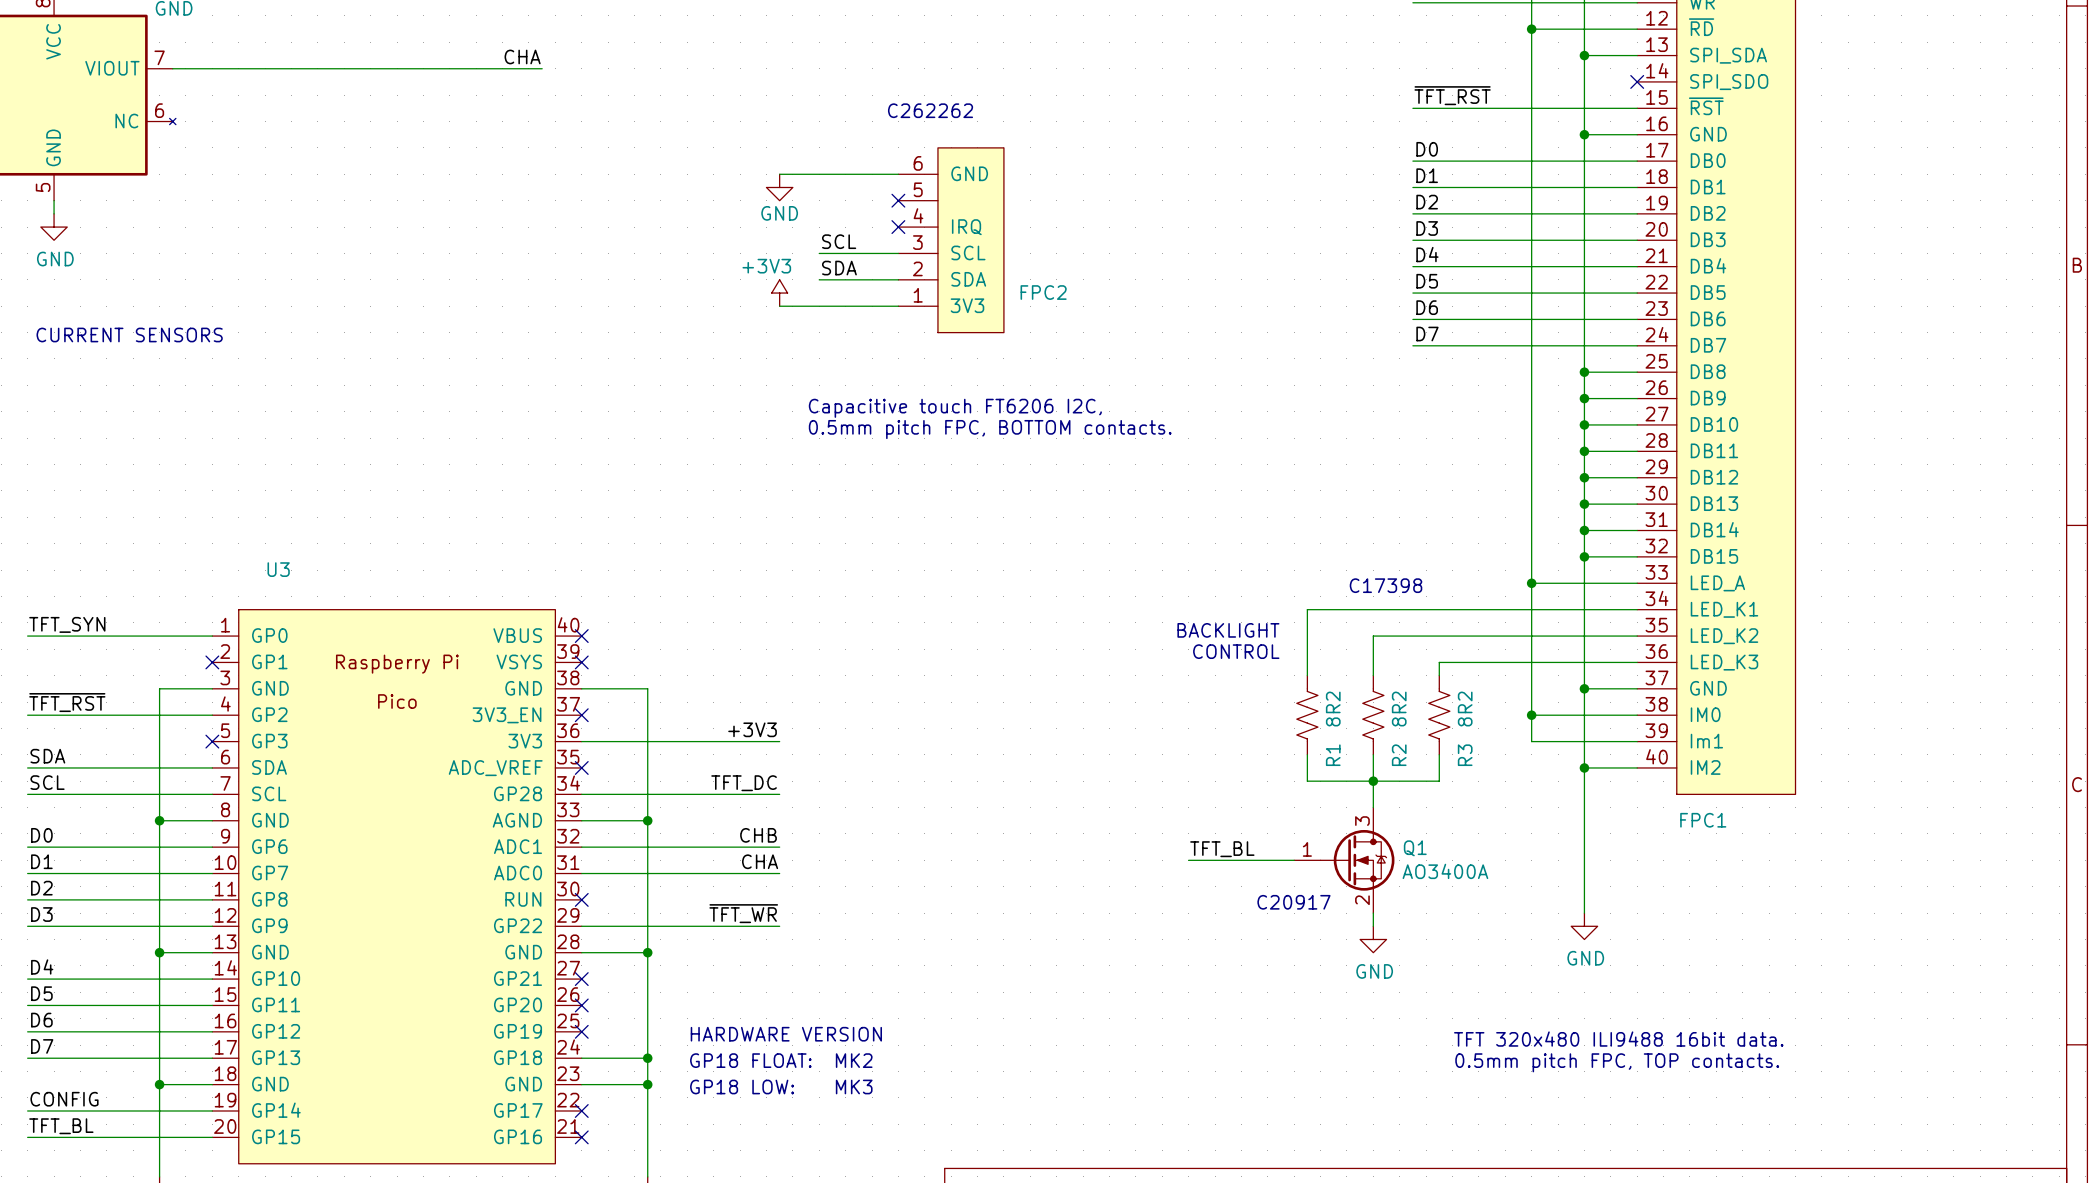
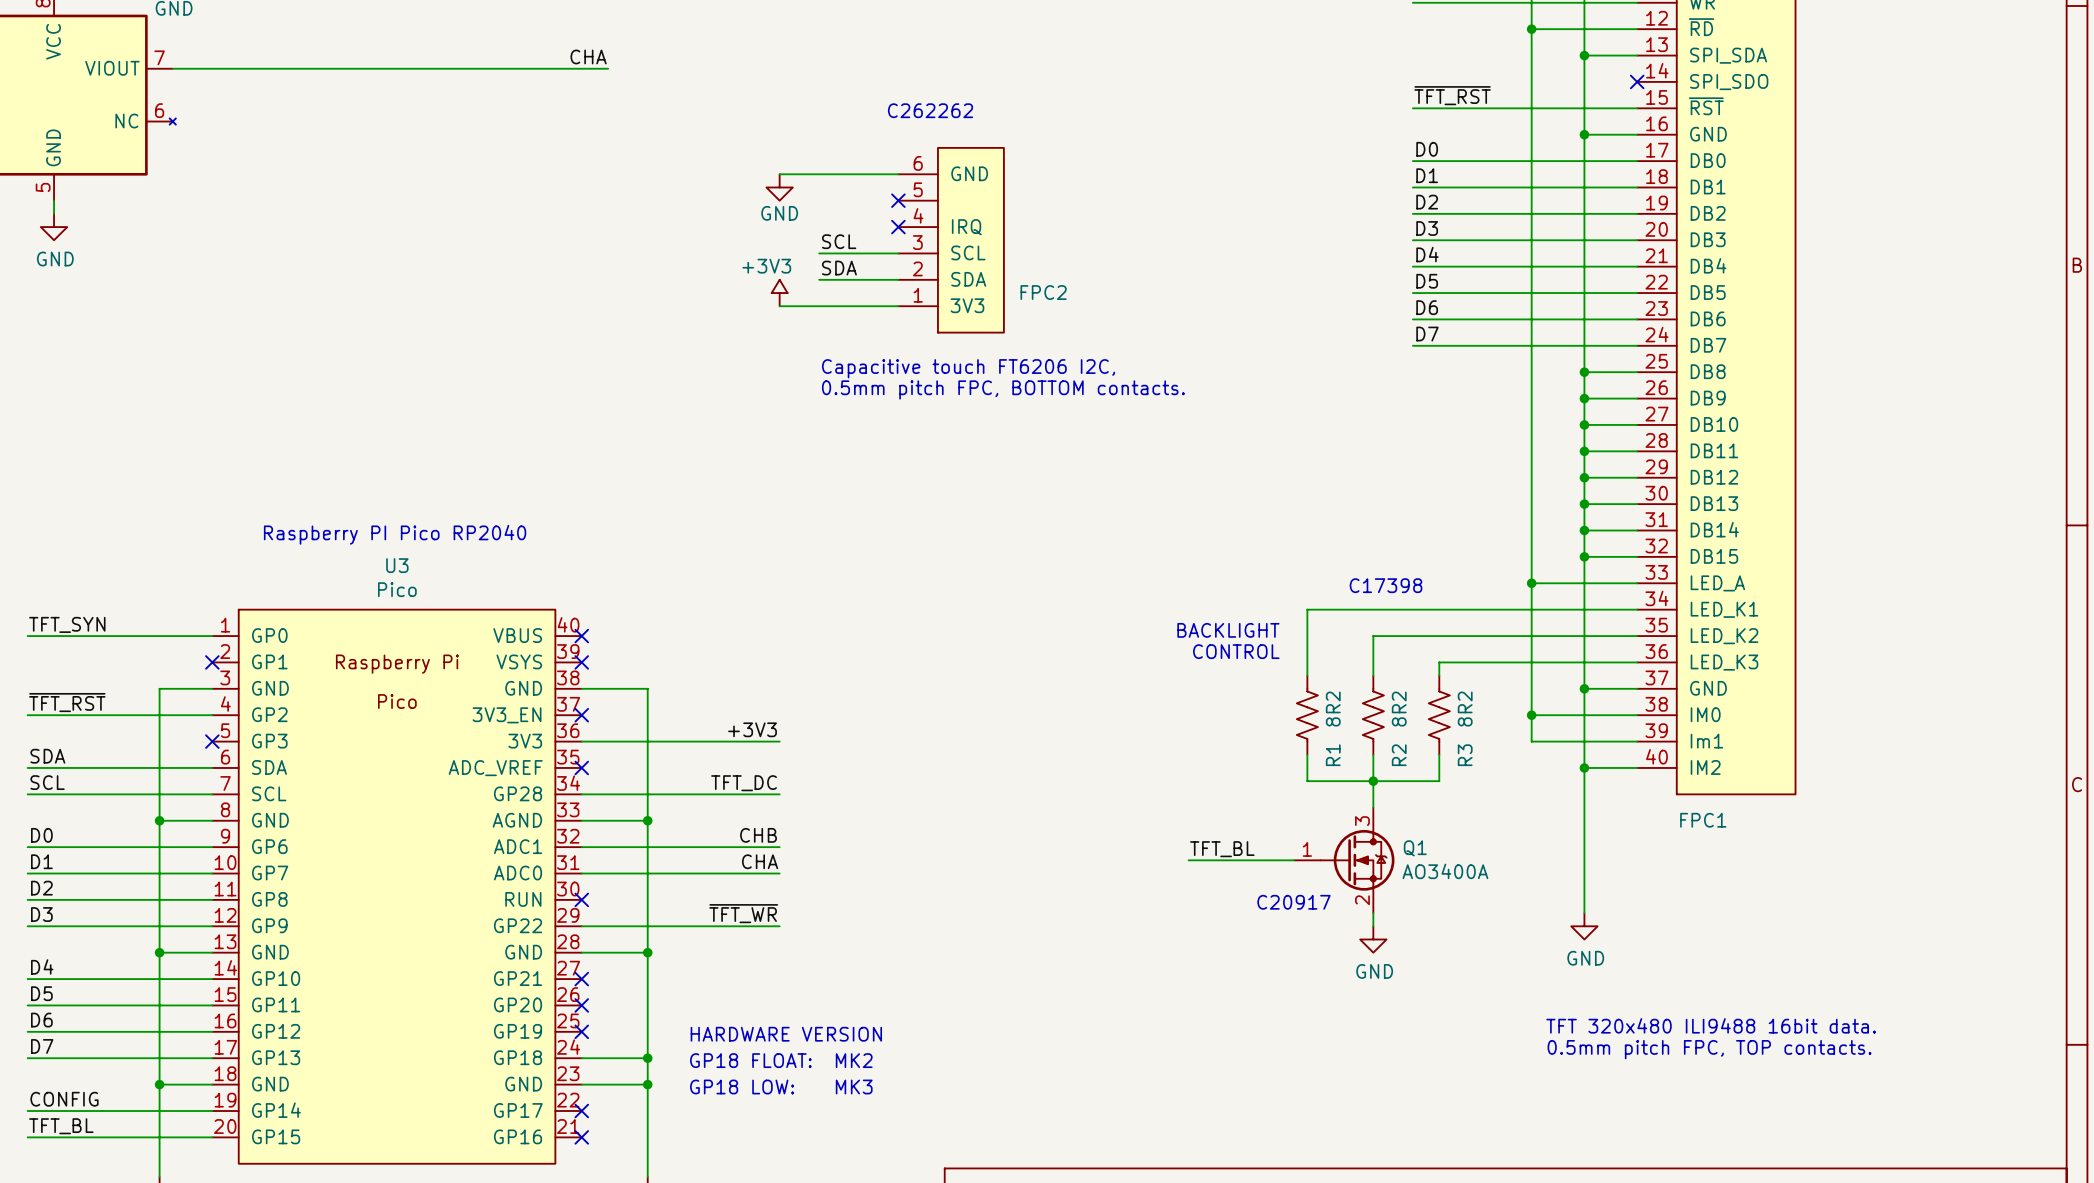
label position: CHA (522, 56) -> CHA (588, 56)
wire: none -> (542, 68) (608, 68)
text: CURRENT SENSORS (129, 334) -> none
text position: Capacitive touch FT6206 I2C, (955, 408) -> Capacitive touch FT6206 I2C, (968, 368)
text position: 0.5mm pitch FPC, BOTTOM contacts. (990, 429) -> 0.5mm pitch FPC, BOTTOM contacts. (1003, 389)
text: none -> Raspberry PI Pico RP2040 (395, 534)
U3 name position: U3 (278, 569) -> U3 (397, 565)
U3 value: none -> Pico (397, 589)
text position: TFT 320x480 ILI9488 16bit data. (1618, 1039) -> TFT 320x480 ILI9488 16bit data. (1711, 1025)
text position: 0.5mm pitch FPC, TOP contacts. (1617, 1062) -> 0.5mm pitch FPC, TOP contacts. (1709, 1049)

